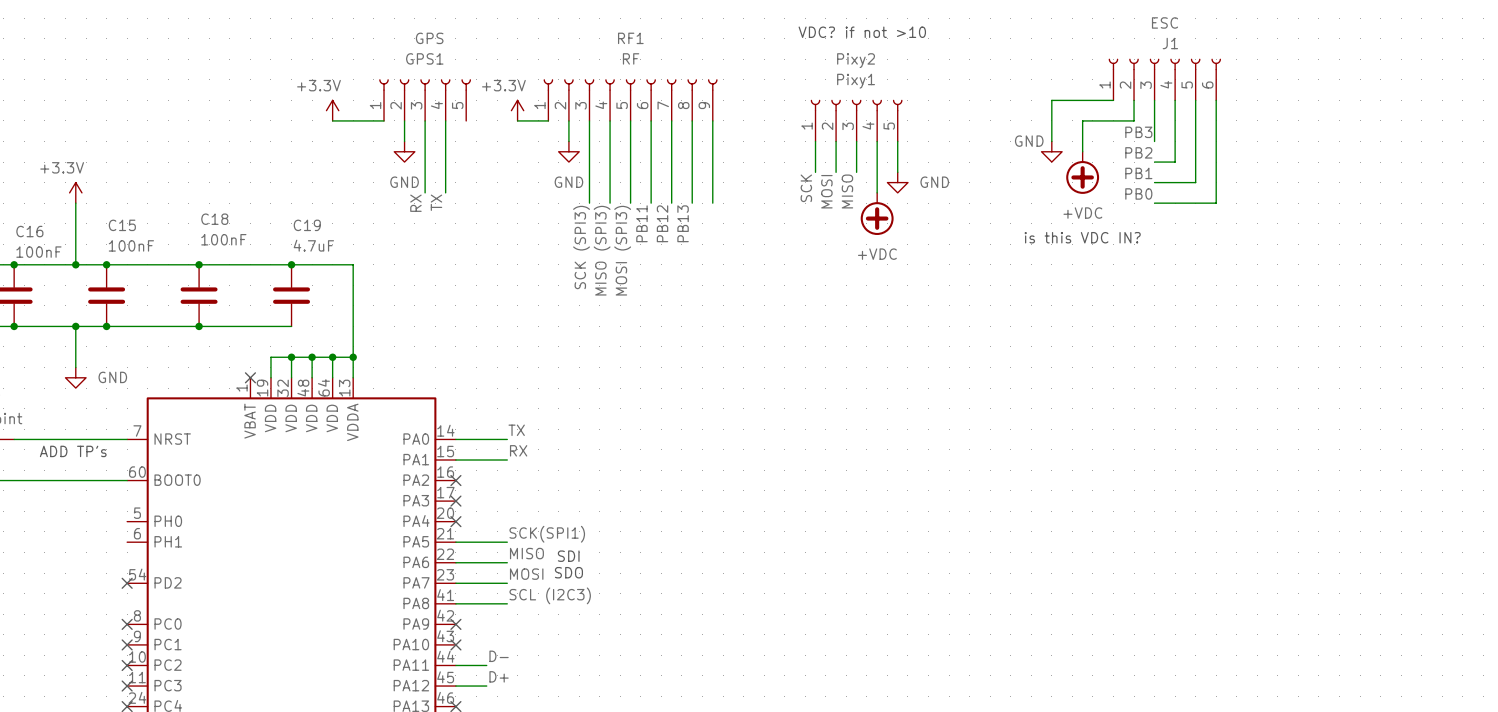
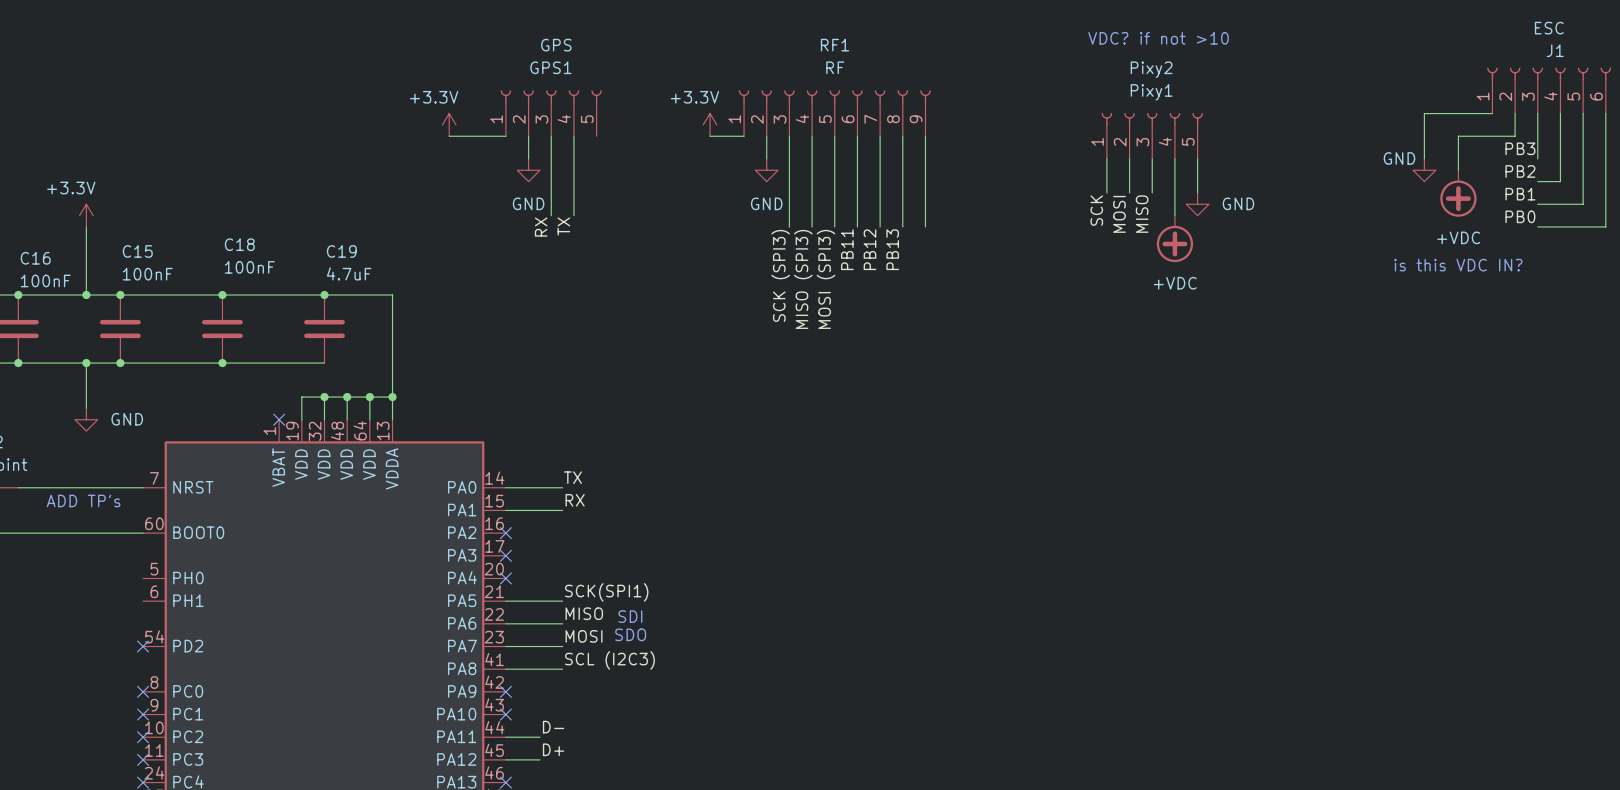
text position: VDC? if not >10 (862, 32) -> VDC? if not >10 (1158, 38)
J1 position: (1164, 79) -> (1549, 90)
GPS1 position: (425, 100) -> (551, 113)
RF1 position: (630, 100) -> (834, 113)
wire: (1113, 100) (1051, 100) (1051, 141) -> none
wire: (1134, 100) (1134, 120) (1082, 120) (1082, 141) -> none
wire: (1154, 100) (1154, 141) -> none
wire: (1175, 100) (1175, 162) (1154, 162) -> none
wire: (1195, 100) (1195, 182) (1154, 182) -> none
wire: (1216, 100) (1216, 203) (1154, 203) -> none
wire: none -> (1492, 113) (1424, 113) (1424, 158)
wire: none -> (1515, 113) (1515, 136) (1458, 136) (1458, 170)
wire: none -> (1537, 113) (1537, 158)
wire: none -> (1560, 113) (1560, 181) (1537, 181)
wire: none -> (1583, 113) (1583, 204) (1537, 204)
wire: none -> (1605, 113) (1605, 226) (1537, 226)
power symbol: +3.3V (332, 110) -> none
power symbol: none -> +3.3V (449, 124)
power symbol: +3.3V (517, 110) -> none
power symbol: none -> +3.3V (710, 124)
wire: (332, 120) (384, 120) -> none
wire: (404, 120) (404, 141) -> (449, 136) (505, 136)
wire: (425, 120) (425, 192) -> (551, 136) (551, 215)
wire: (445, 120) (445, 192) -> none
wire: (517, 120) (548, 120) -> (573, 136) (573, 215)
wire: (568, 120) (568, 141) -> (528, 136) (528, 158)
wire: (589, 120) (589, 203) -> none
wire: (610, 120) (610, 203) -> (812, 136) (812, 226)
wire: (630, 120) (630, 203) -> (834, 136) (834, 226)
wire: (651, 120) (651, 203) -> (857, 136) (857, 226)
wire: (671, 120) (671, 203) -> (744, 136) (710, 136)
wire: none -> (880, 136) (880, 226)
Pixy1 position: (856, 120) -> (1152, 135)
label: PB3 (1138, 132) -> none
label: none -> PB3 (1520, 148)
wire: (692, 141) (692, 203) -> none
wire: (856, 141) (856, 172) -> (1106, 158) (1106, 192)
wire: (877, 141) (877, 192) -> (1174, 158) (1174, 215)
wire: (897, 141) (897, 172) -> (1129, 158) (1129, 192)
power symbol text position: GND (1029, 141) -> GND (1238, 203)
wire: none -> (1152, 158) (1152, 192)
power symbol: GND (404, 151) -> none
power symbol: none -> GND (528, 170)
power symbol: GND (568, 151) -> none
power symbol: none -> GND (766, 170)
power symbol position: GND (1051, 151) -> GND (1197, 204)
power symbol: none -> GND (1424, 170)
label: PB2 (1138, 152) -> none
label: none -> PB2 (1520, 171)
wire: none -> (902, 192) (902, 226)
wire: none -> (925, 192) (925, 226)
power symbol position: +VDC (1082, 172) -> +VDC (1174, 238)
power symbol: none -> +VDC (1458, 193)
label: PB1 (1138, 173) -> none
label: none -> PB1 (1520, 194)
power symbol: GND (897, 182) -> none
label position: SCK (806, 188) -> SCK (1096, 210)
label position: MOSI (826, 191) -> MOSI (1119, 214)
label position: MISO (847, 191) -> MISO (1142, 214)
label: PB0 (1138, 193) -> none
label: none -> PB0 (1520, 216)
label position: TX (436, 202) -> TX (563, 226)
label position: RX (415, 203) -> RX (541, 227)
power symbol: +VDC (877, 213) -> none
label position: PB11 (641, 223) -> PB11 (847, 249)
label position: PB12 (662, 223) -> PB12 (869, 249)
label position: PB13 (683, 223) -> PB13 (892, 249)
text: is this VDC IN? (1082, 237) -> none
text: none -> is this VDC IN? (1458, 265)
label position: SCK (SPI3) (581, 247) -> SCK (SPI3) (780, 275)
label position: MISO (SPI3) (602, 250) -> MISO (SPI3) (803, 279)
label position: MOSI (SPI3) (622, 250) -> MOSI (SPI3) (825, 279)

